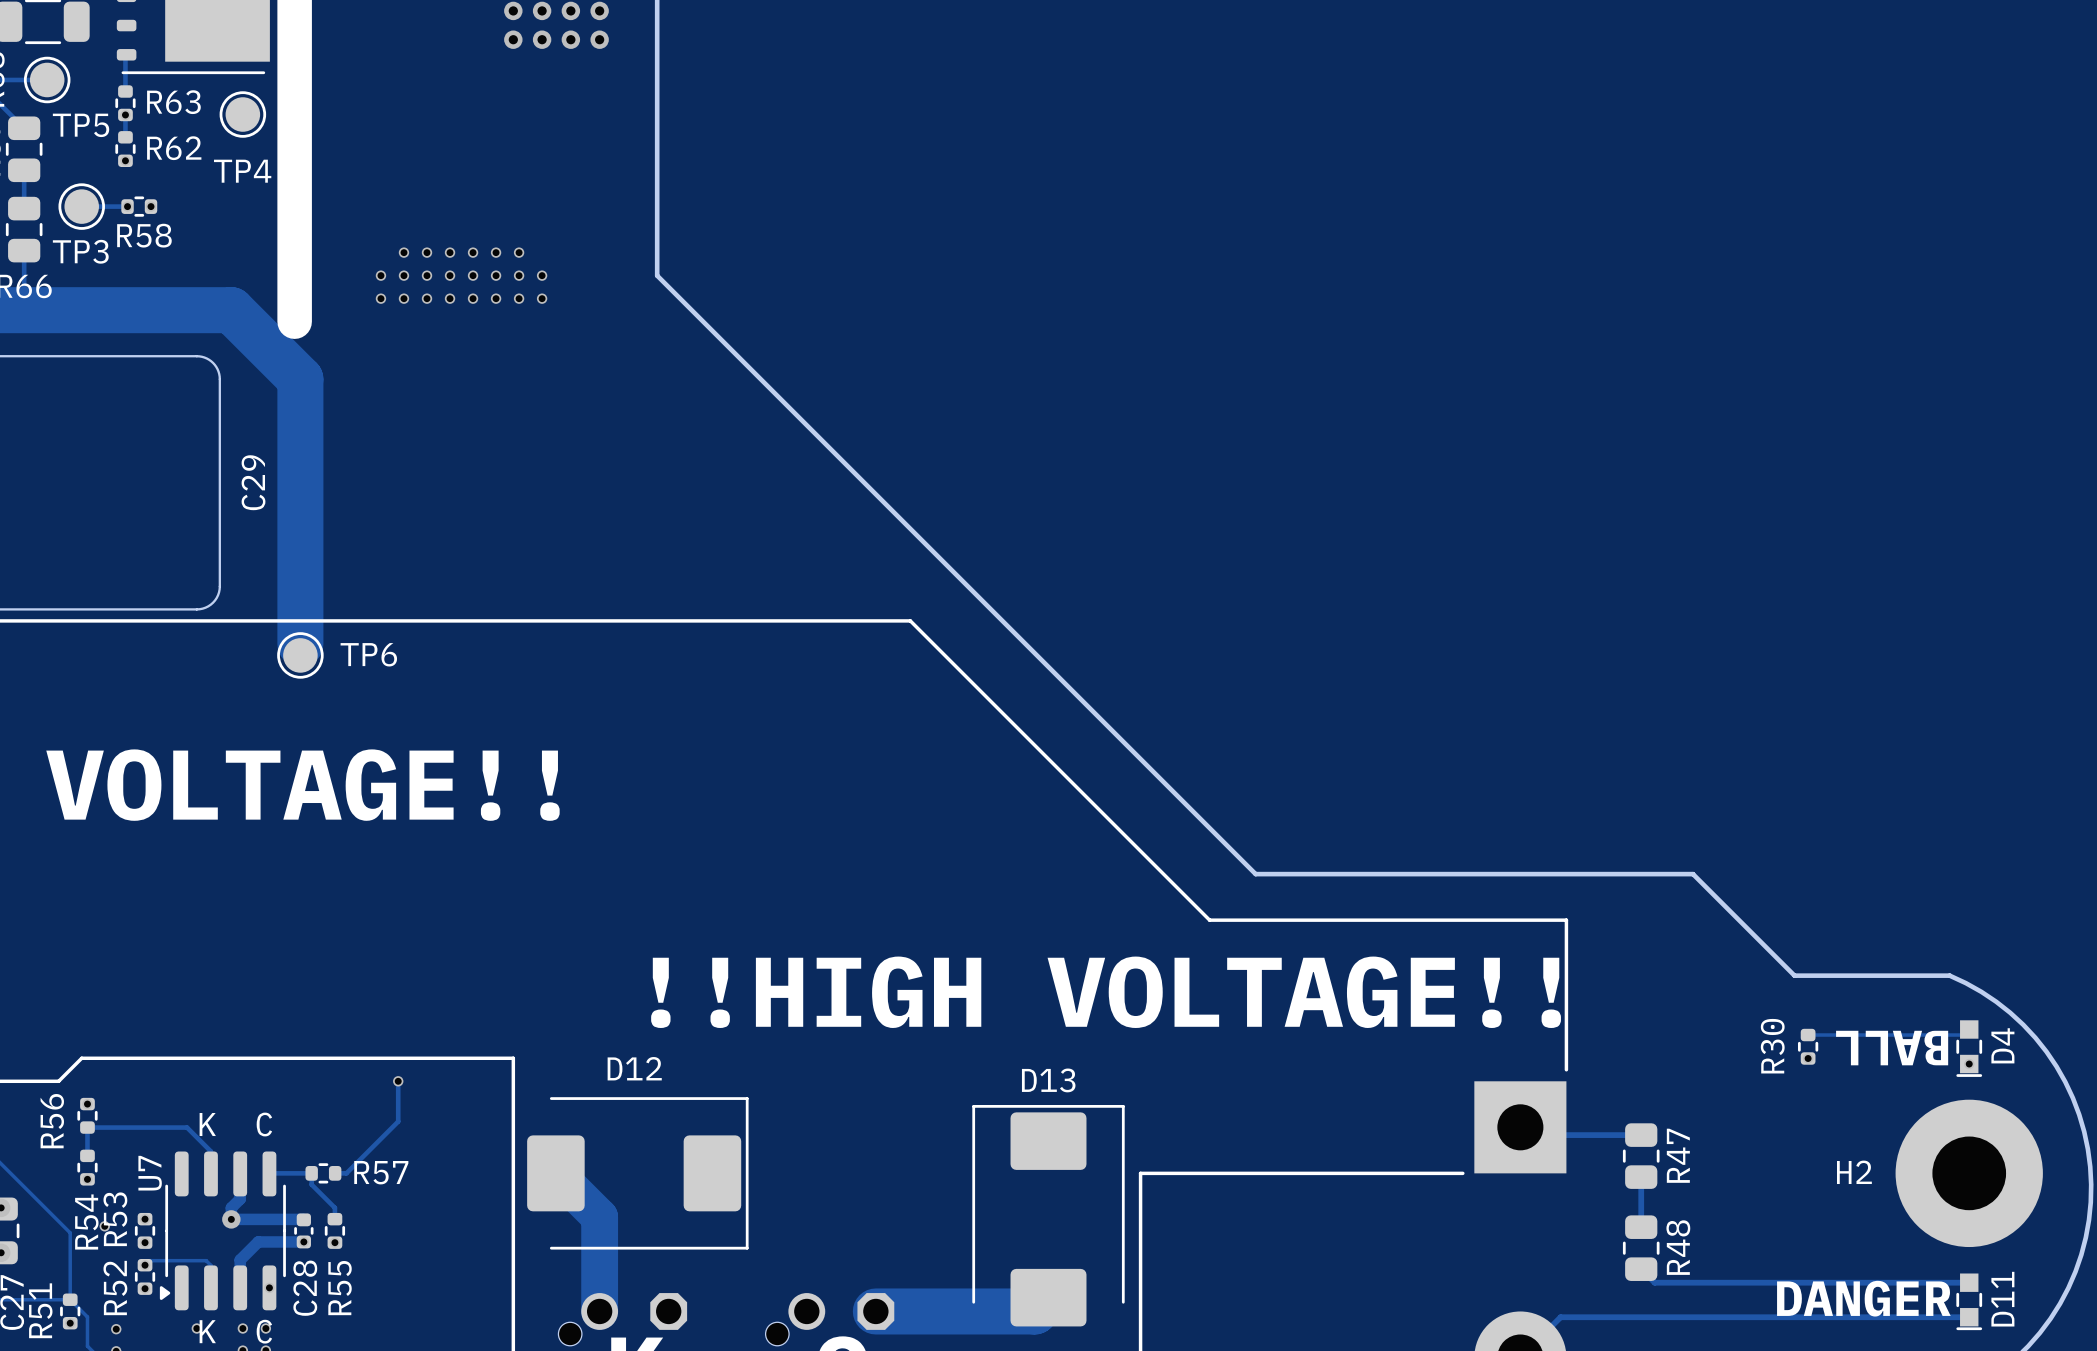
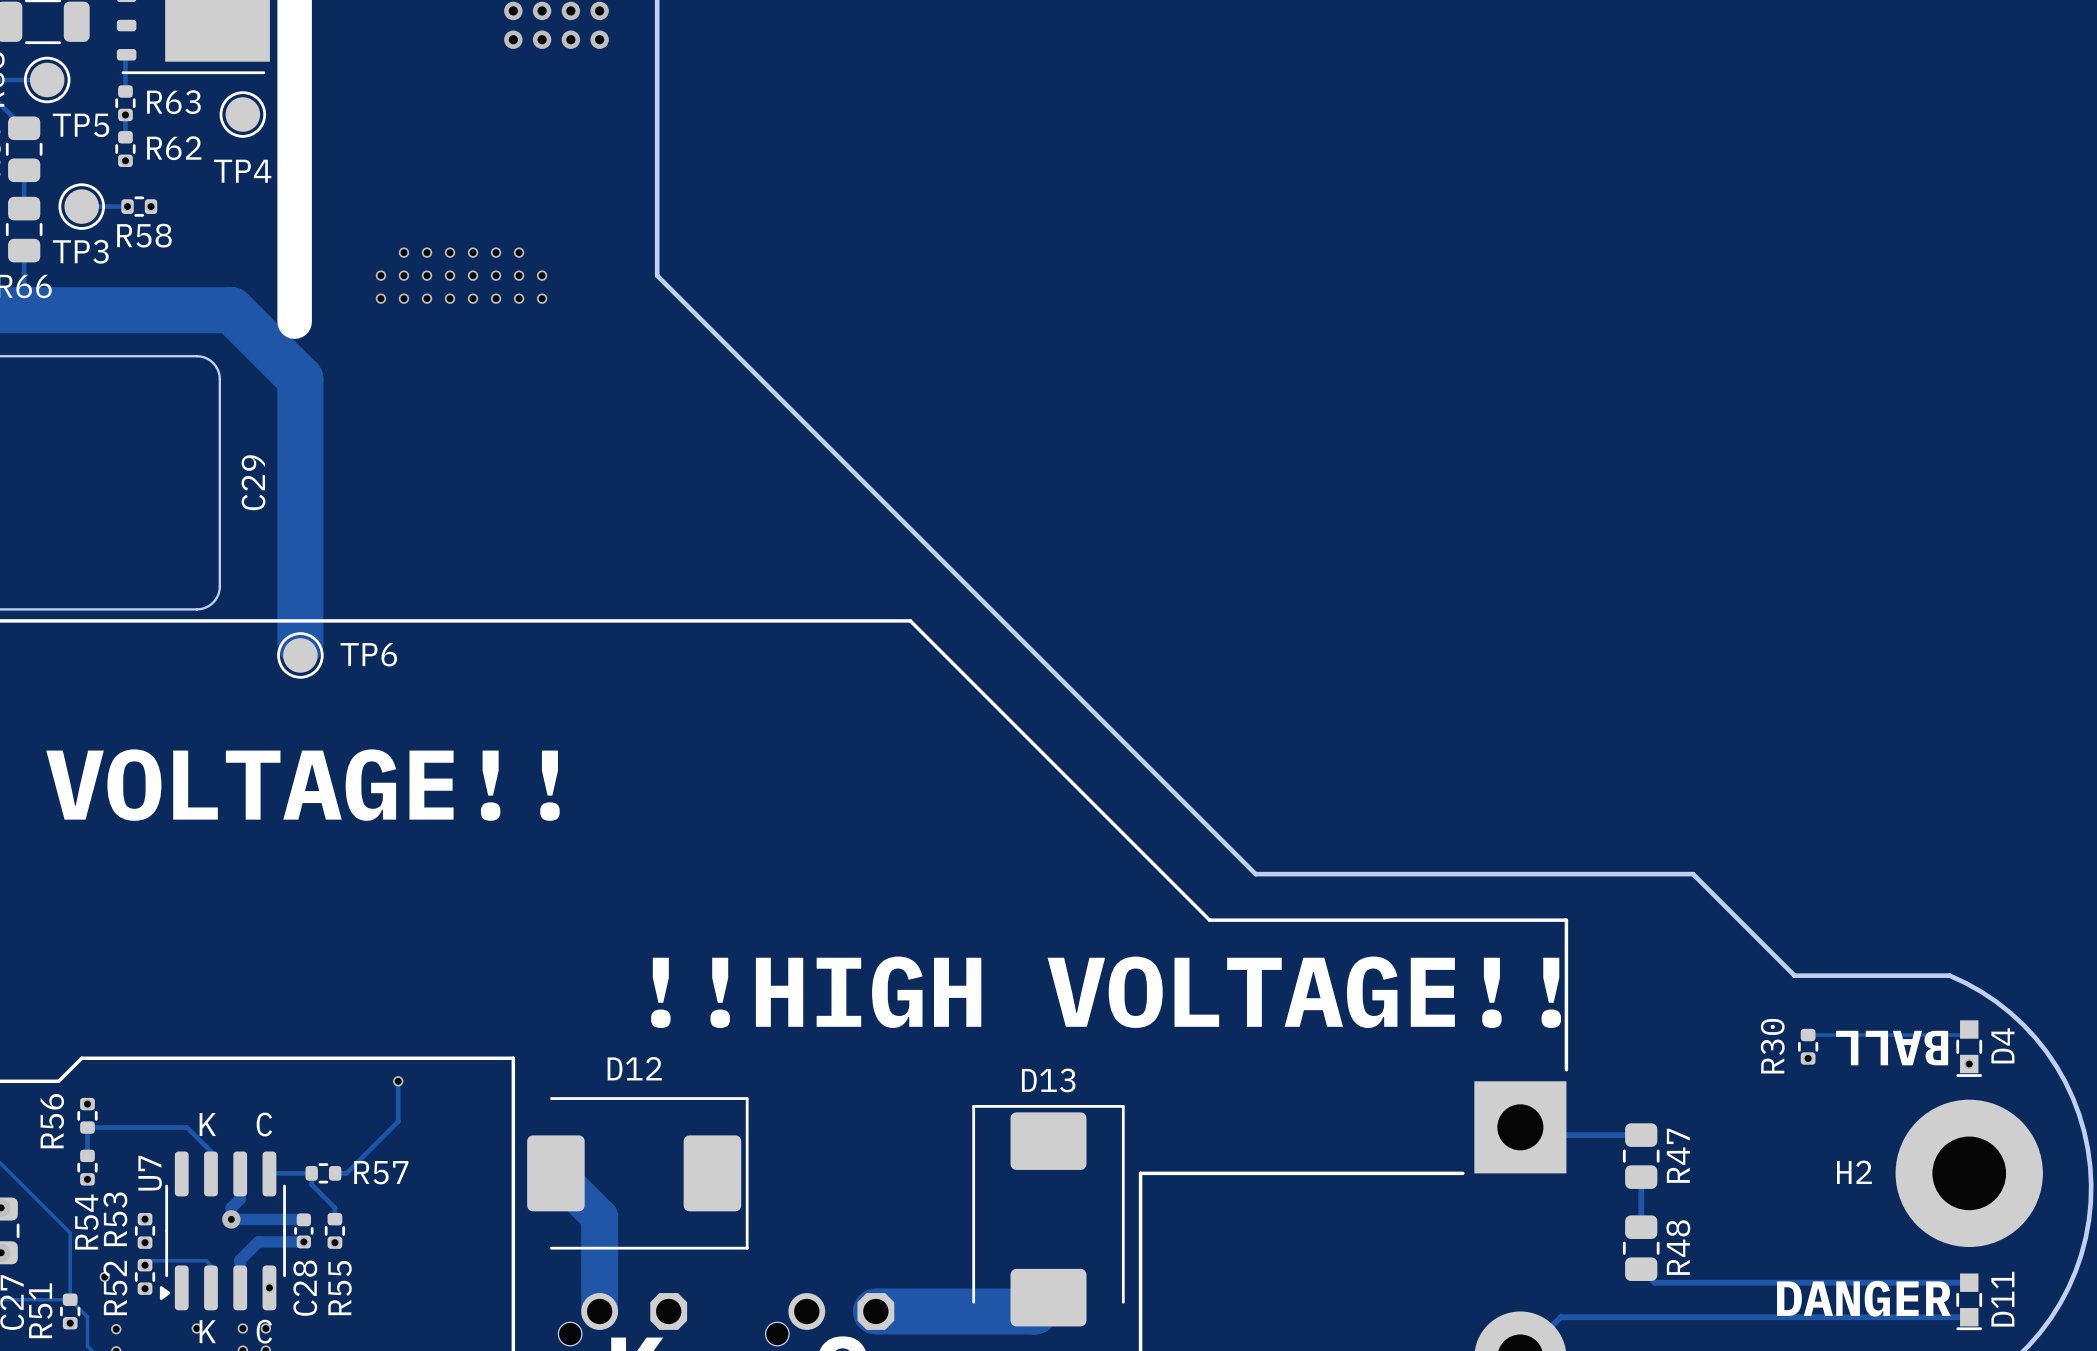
via position: (104, 1226) -> (104, 1276)

